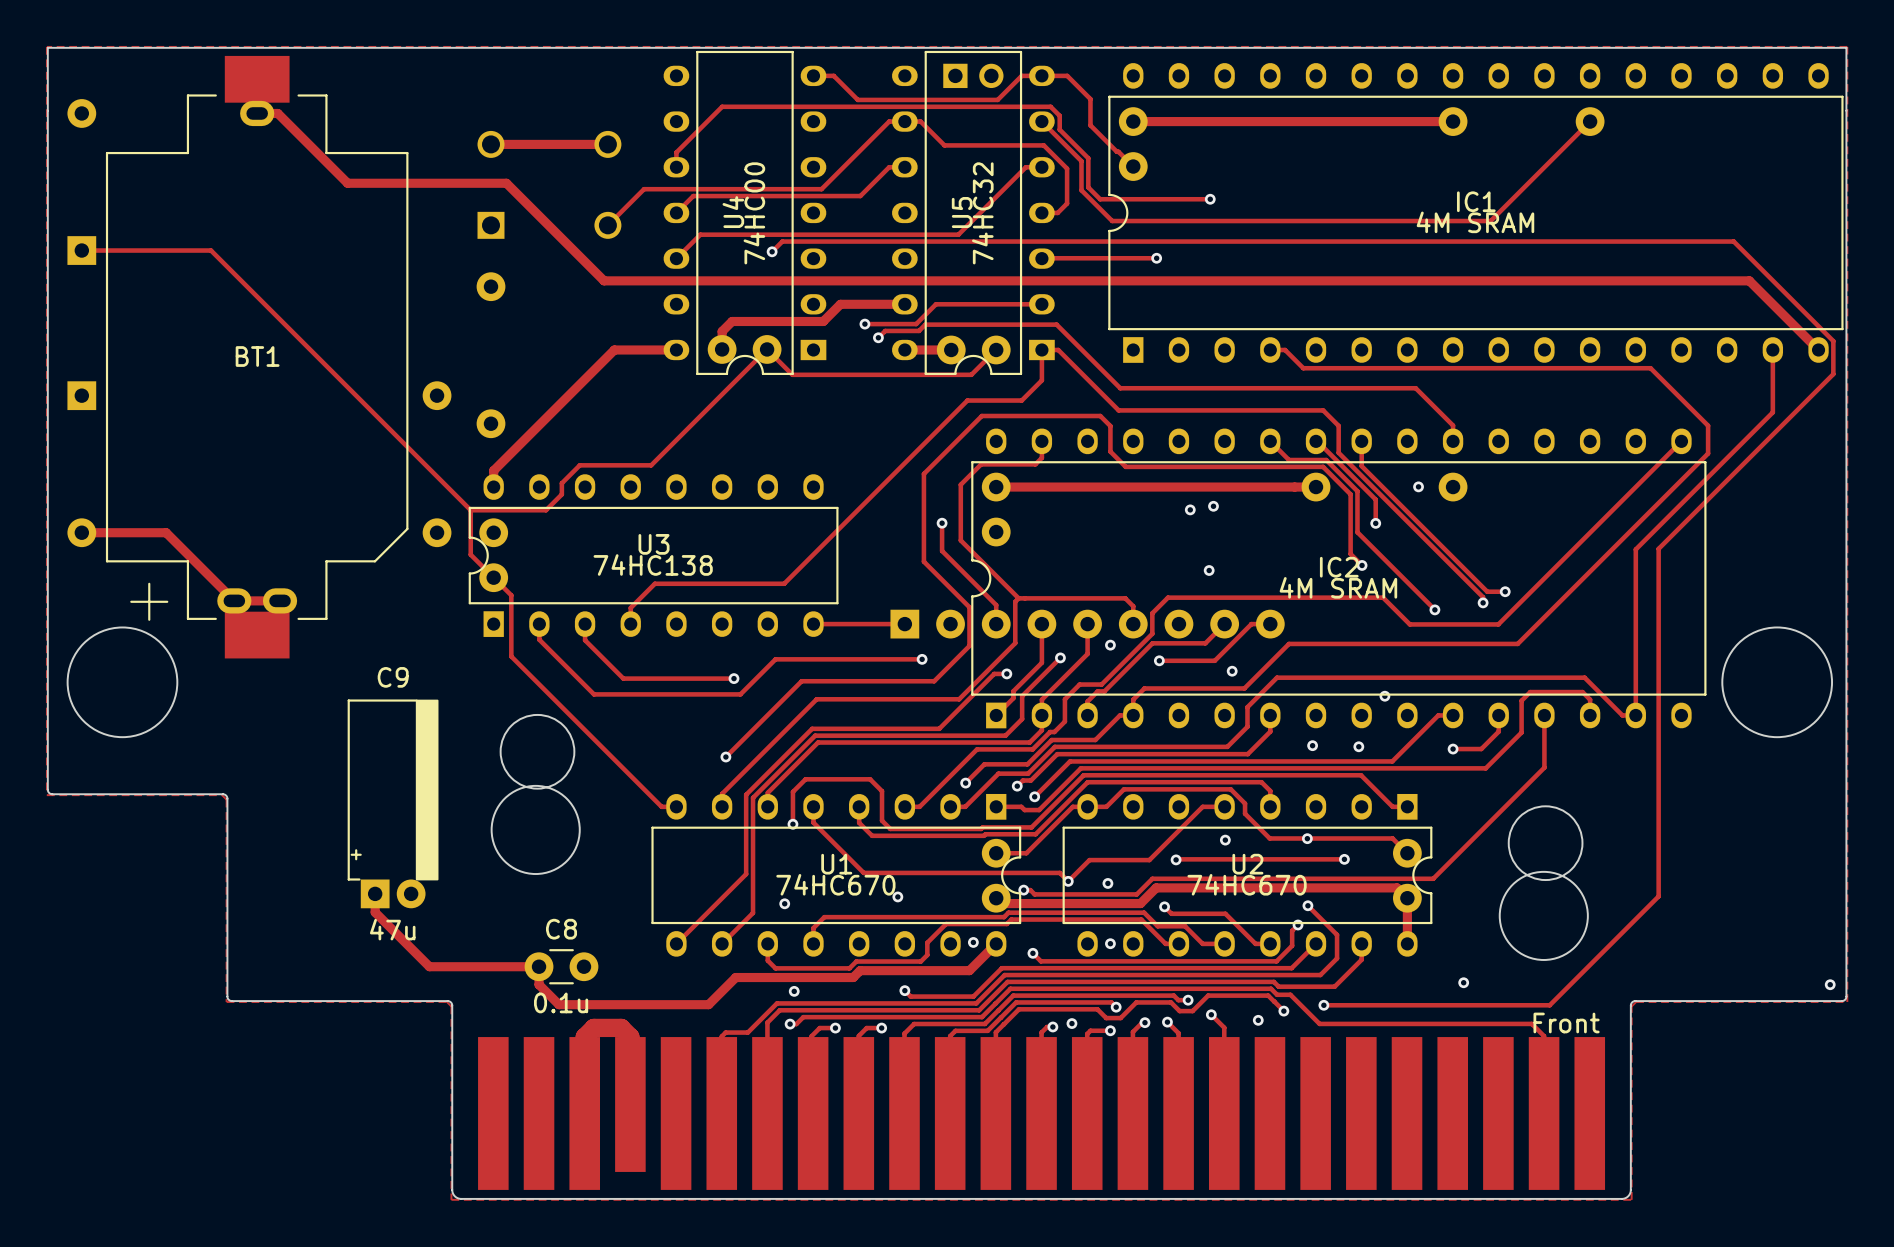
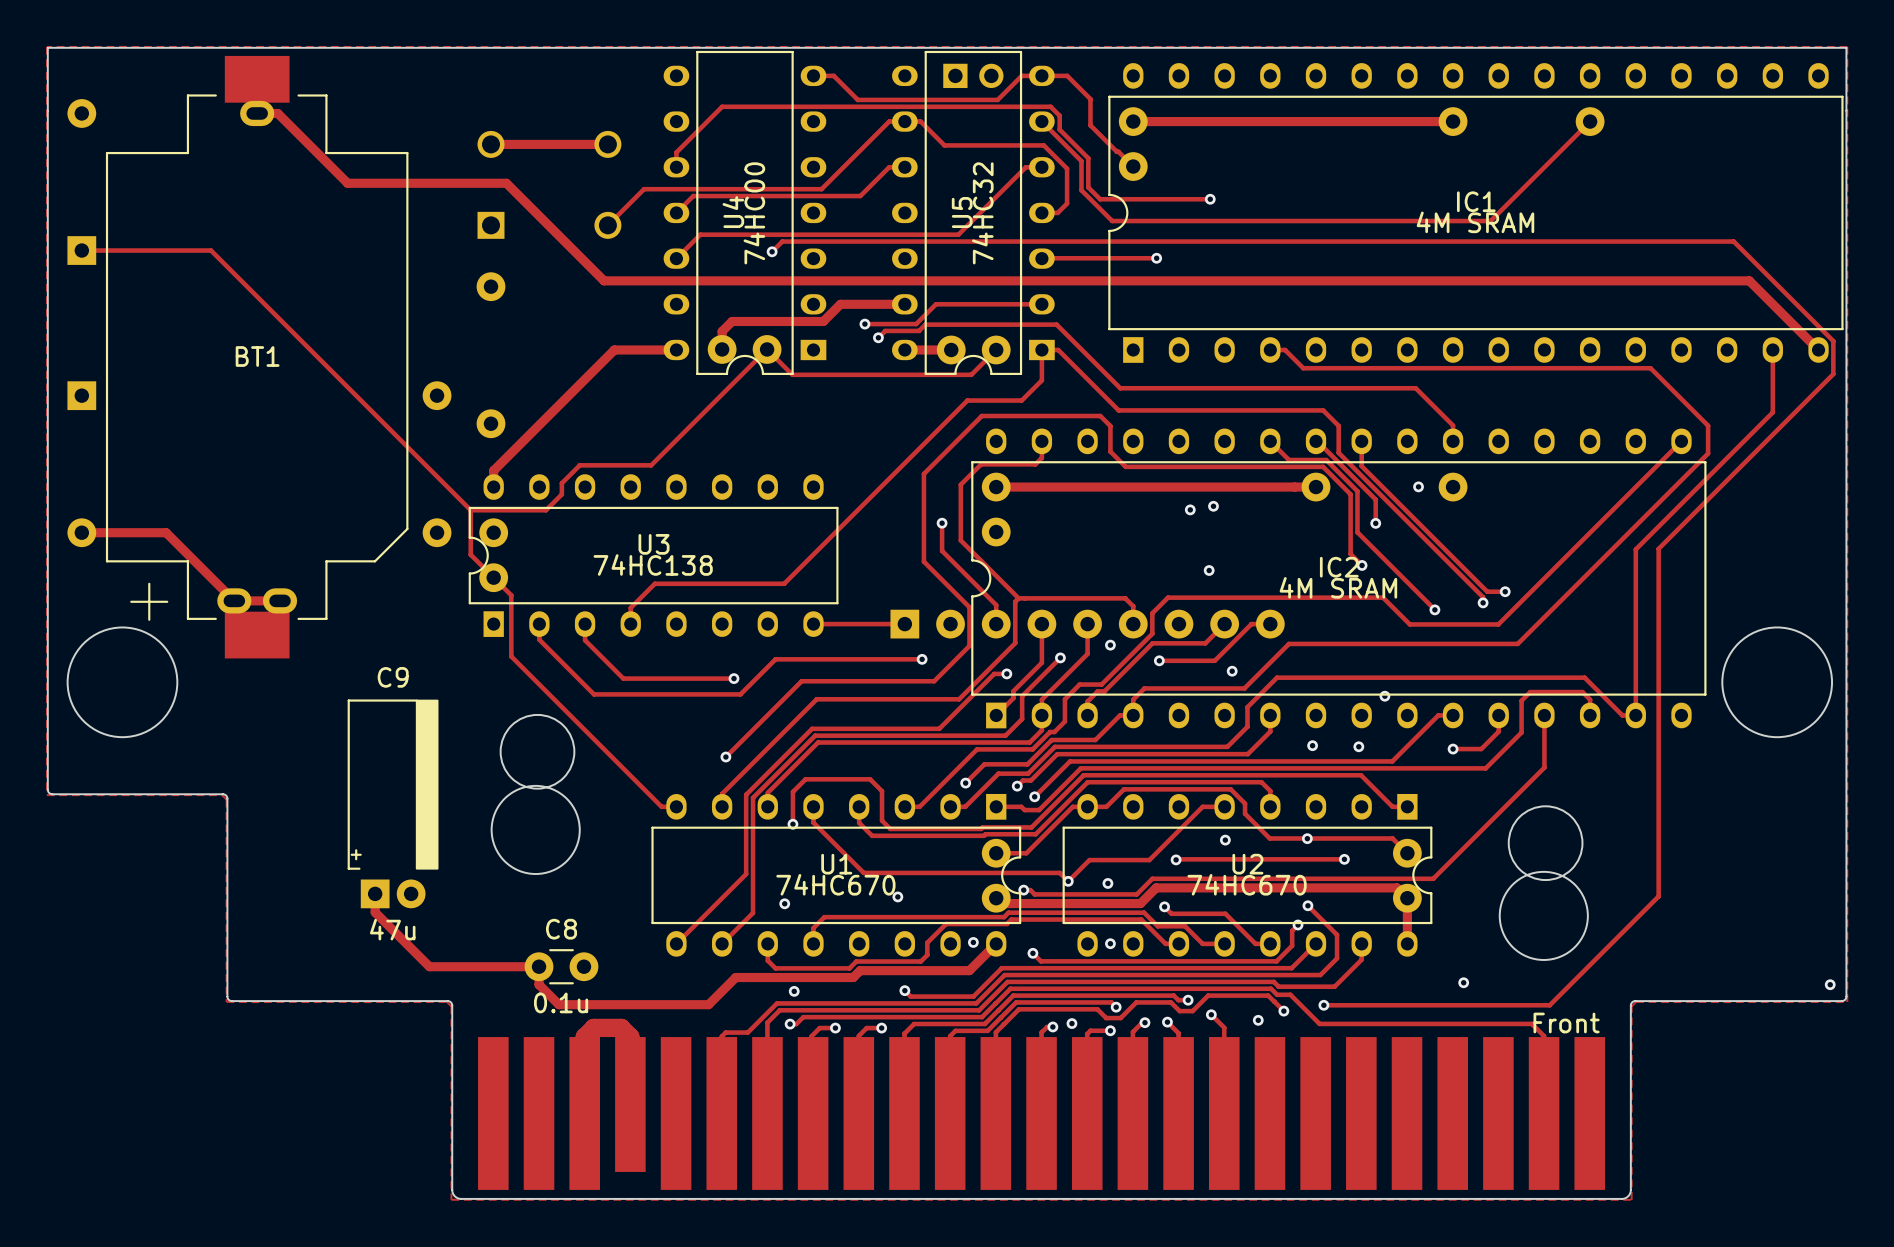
C9 footprint: [347, 699, 439, 909] -> [347, 699, 439, 909]

